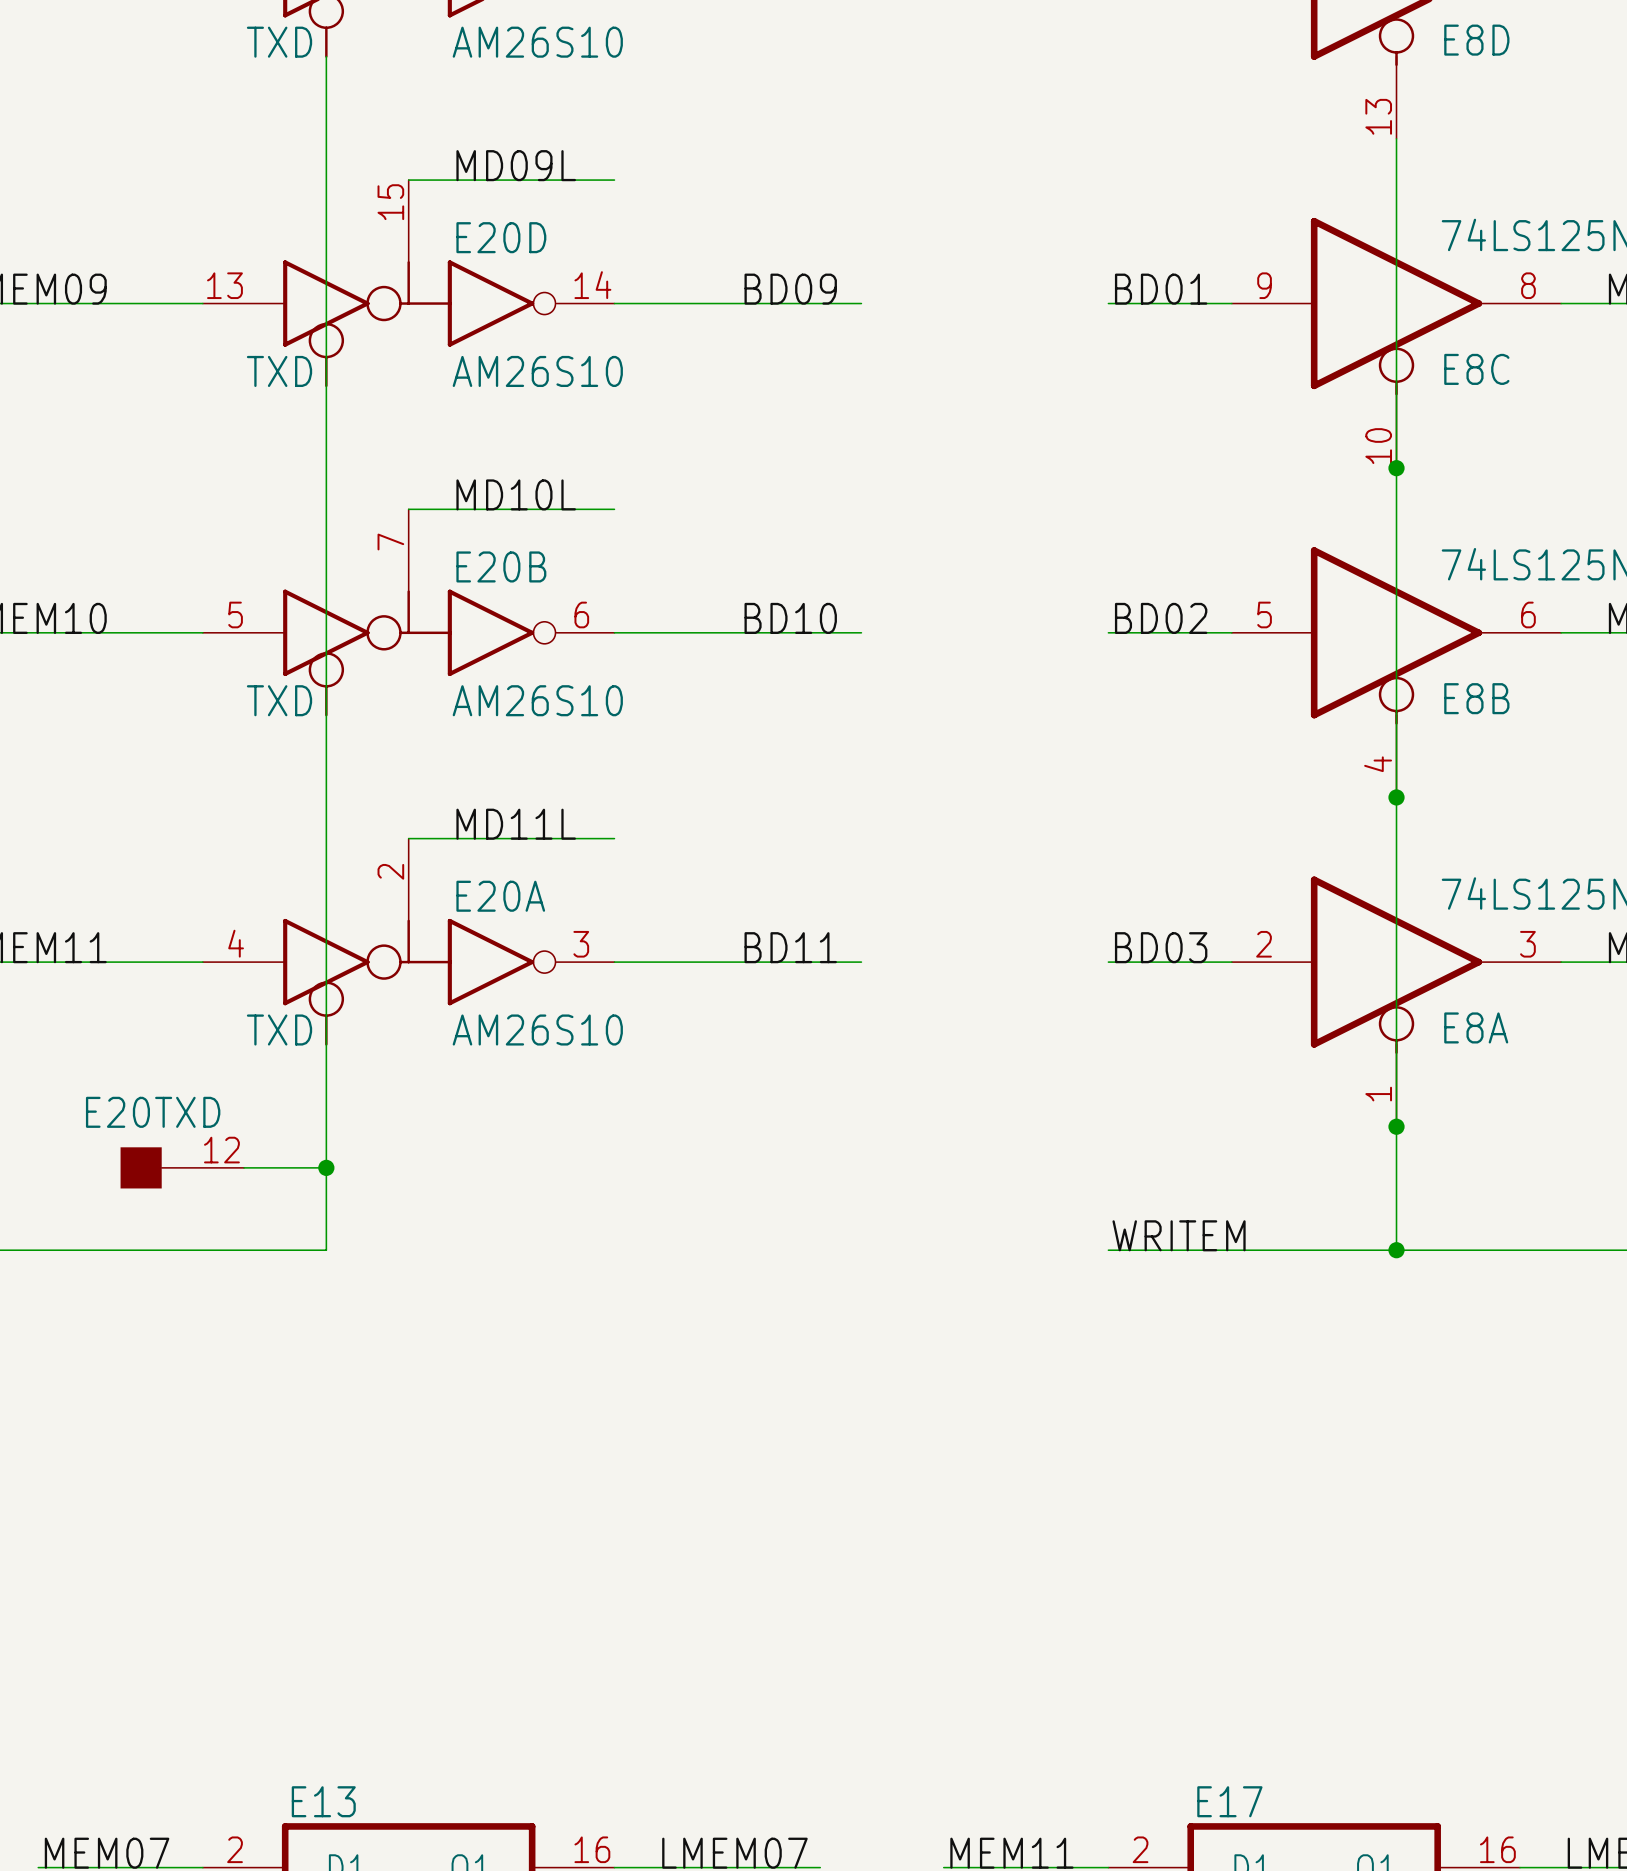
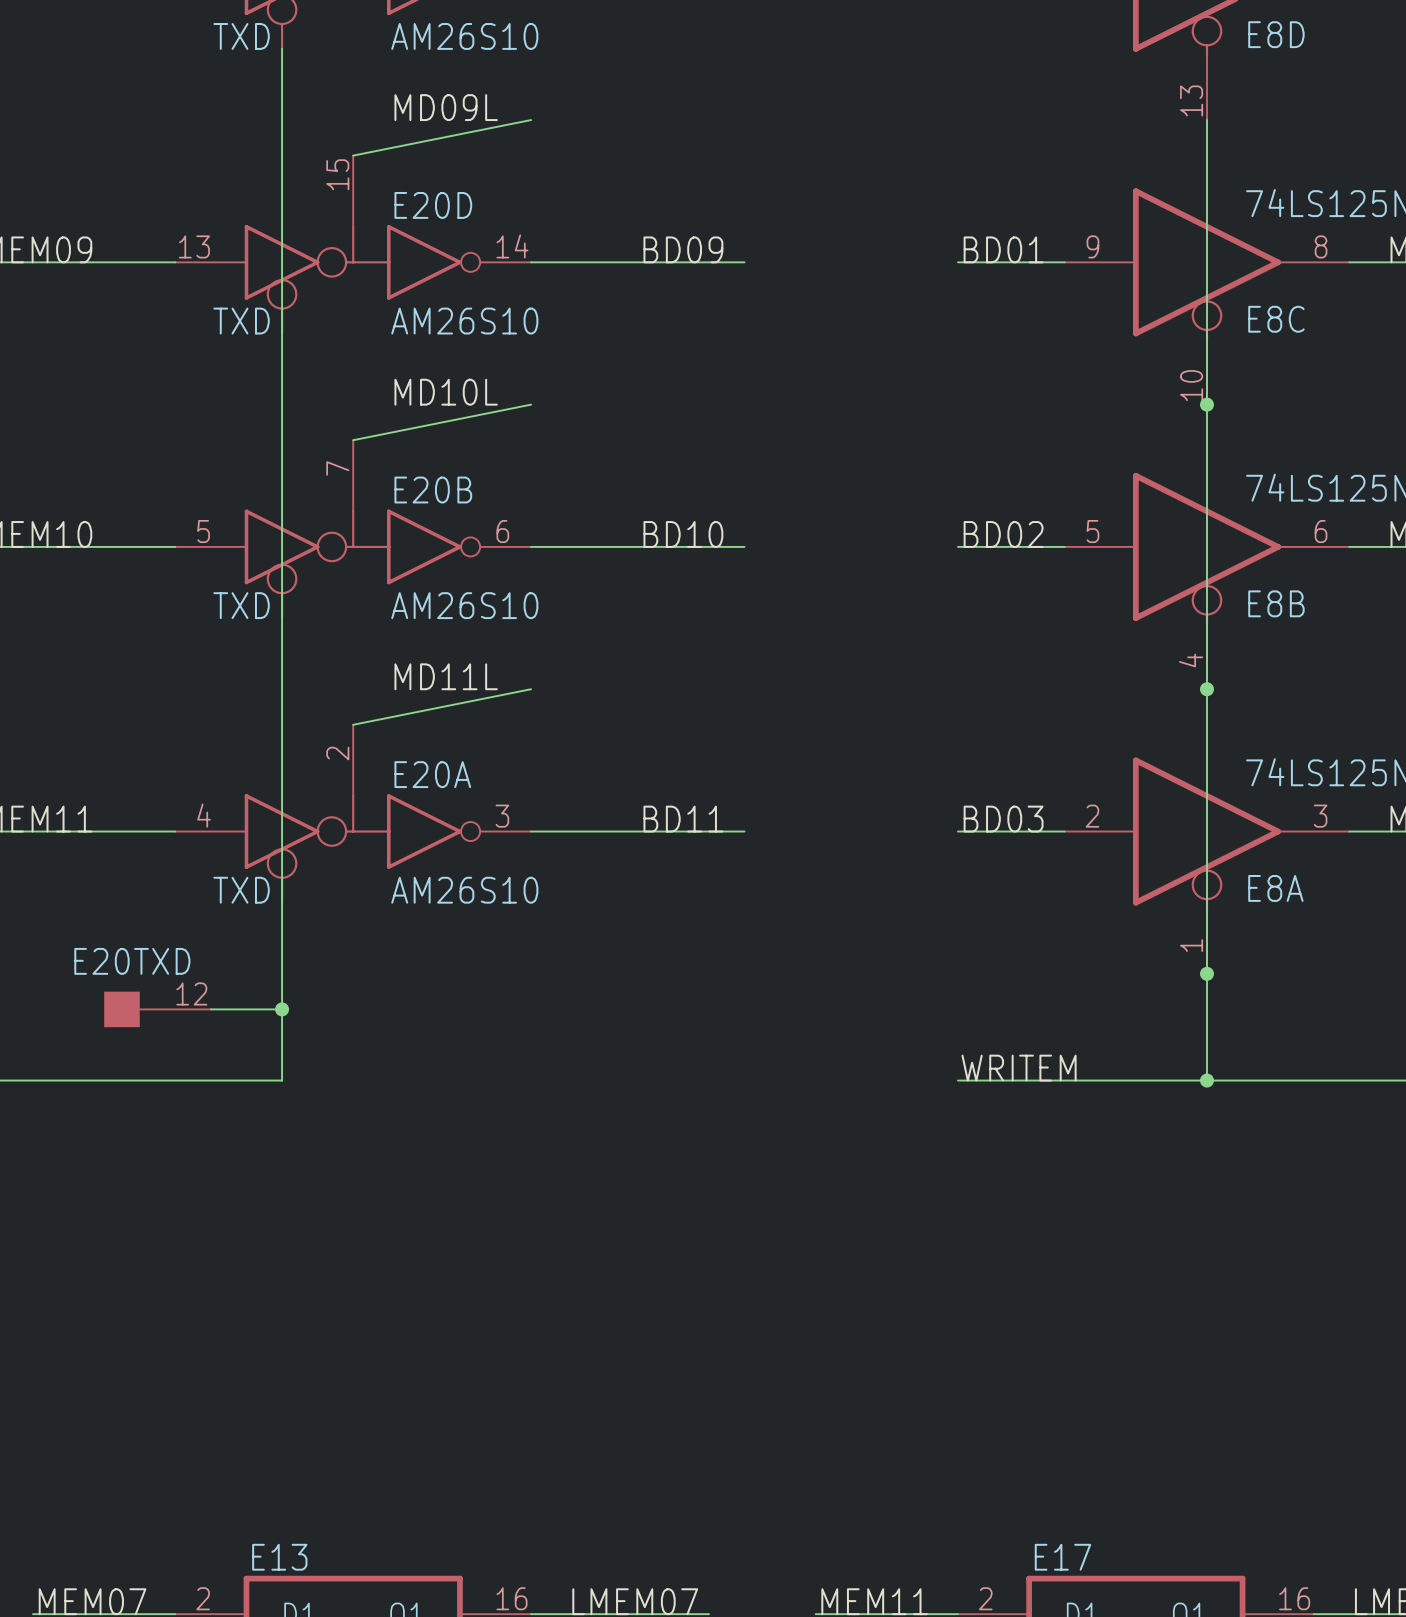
label position: MD09L (516, 165) -> MD09L (446, 107)
wire: (408, 180) (614, 180) -> (353, 155) (531, 120)
label position: MD10L (516, 494) -> MD10L (446, 392)
wire: (408, 509) (614, 509) -> (353, 440) (531, 404)
label position: MD11L (516, 824) -> MD11L (446, 676)
wire: (408, 838) (614, 838) -> (353, 724) (531, 689)

